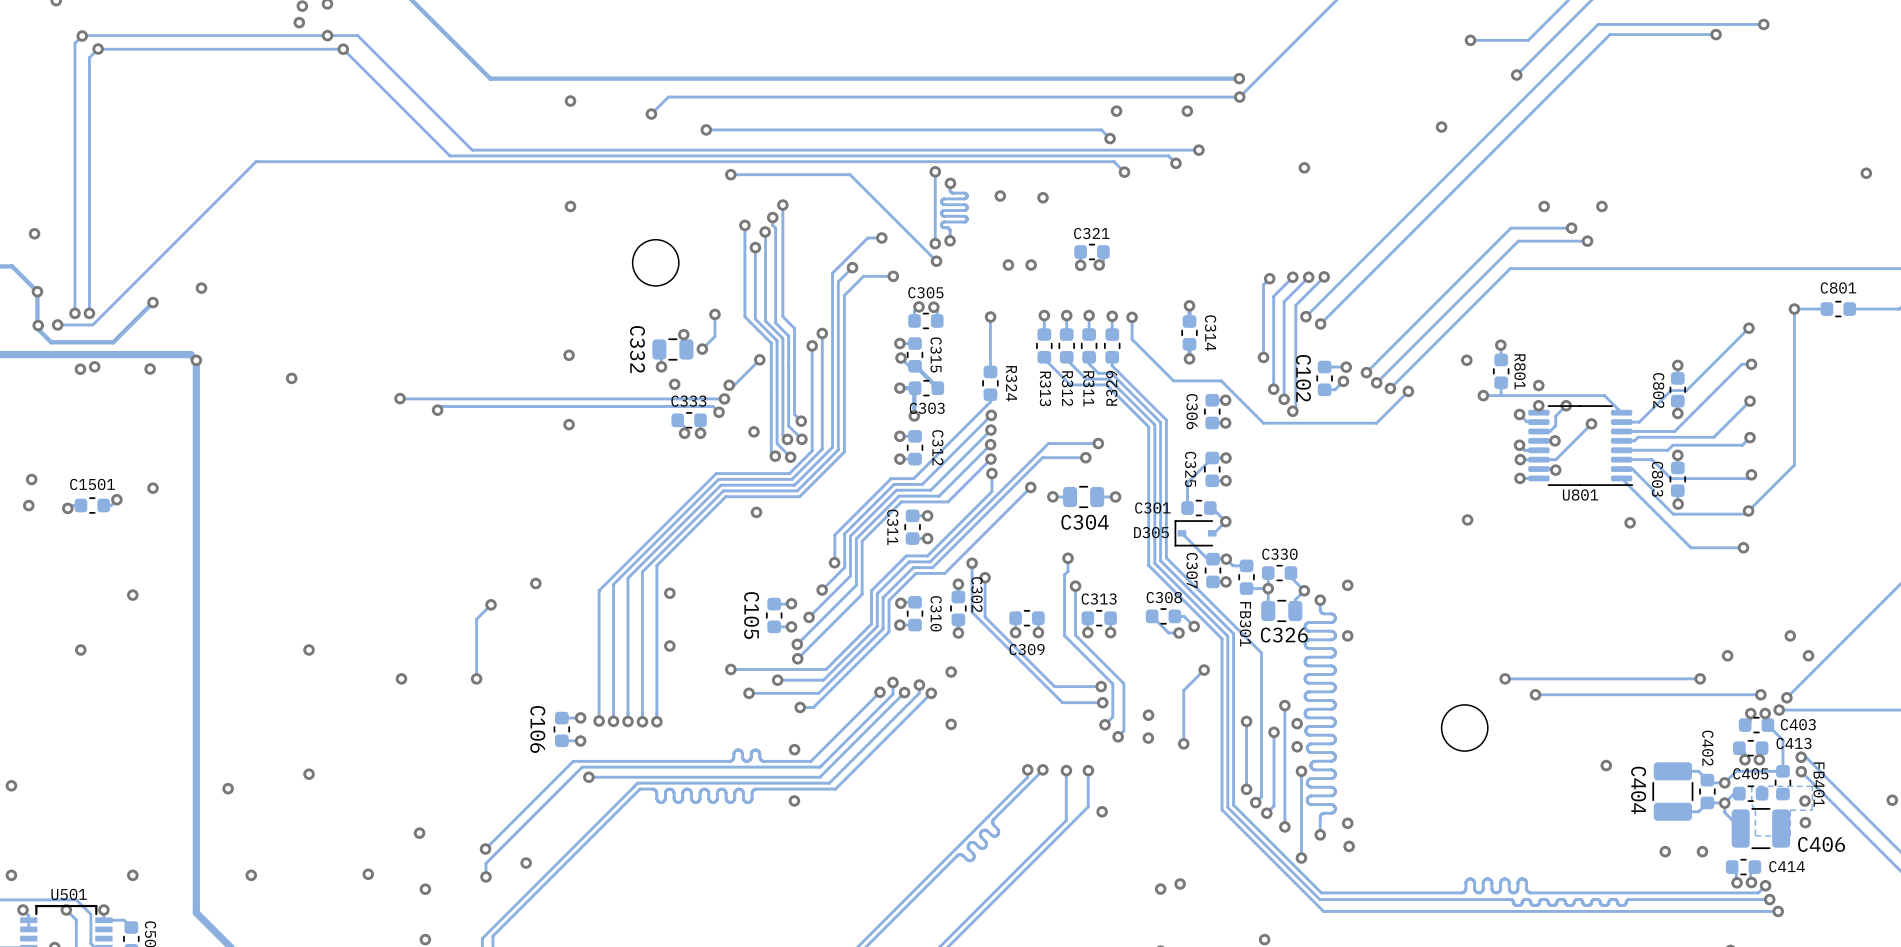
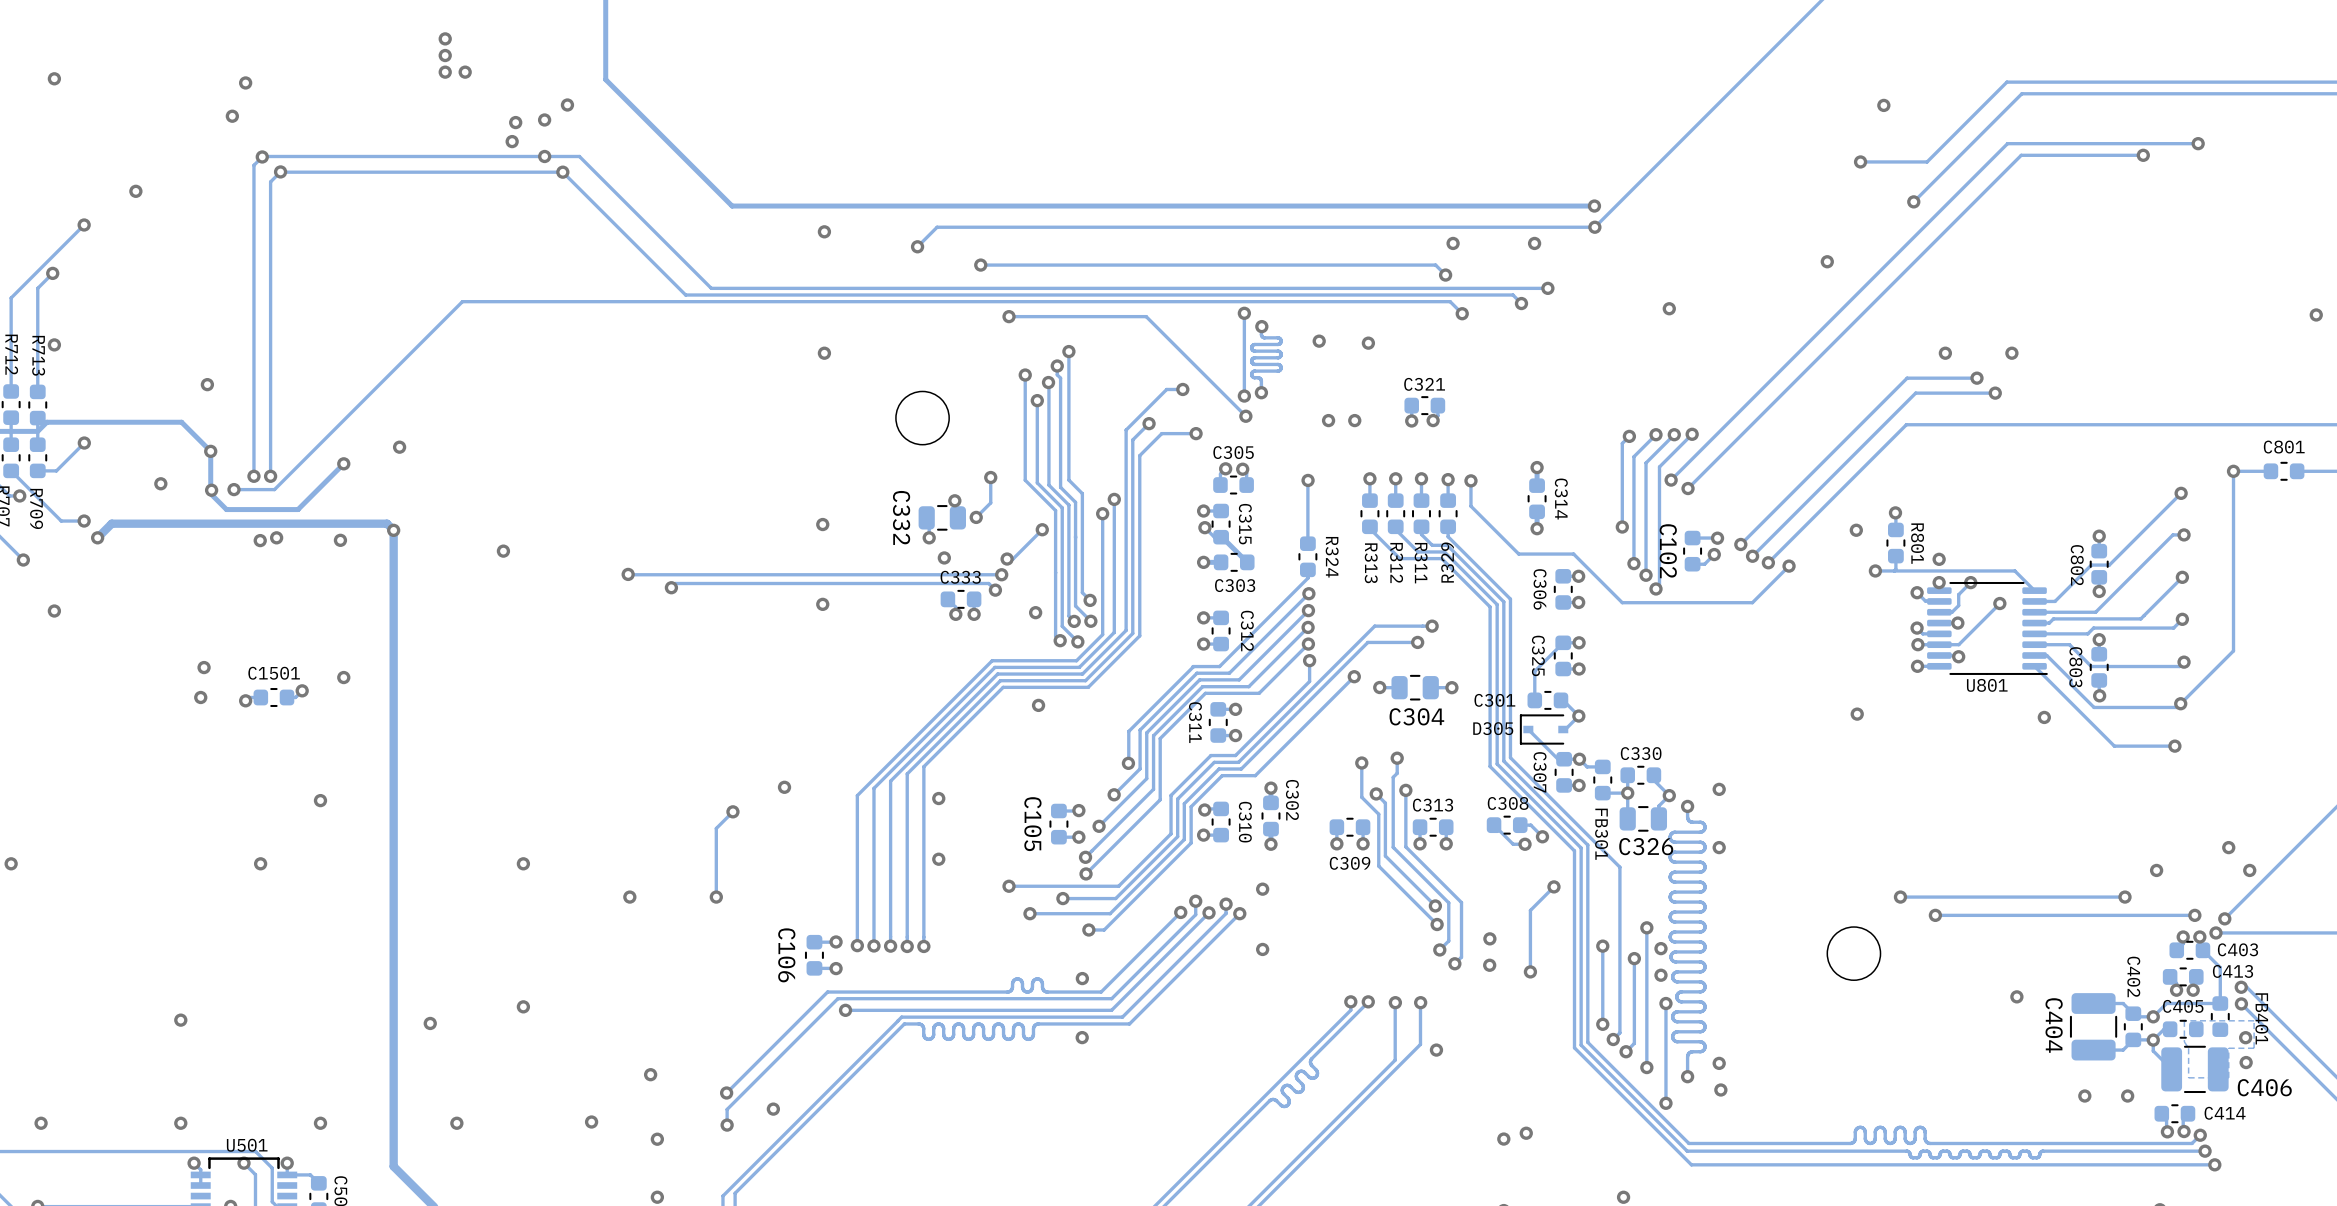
track: (914, 388) (914, 415) -> none
via: (914, 415) -> none
via: none -> (1361, 763)
track: (972, 563) (972, 612) (1062, 702) (1102, 702) -> (1361, 763) (1361, 797) (1378, 814) (1378, 866) (1437, 924)
via: (972, 563) -> none
track: (985, 577) (985, 617) (1054, 686) (1101, 686) -> (1376, 793) (1385, 803) (1385, 855) (1435, 905)
via: (985, 577) -> none
via: none -> (1376, 793)

